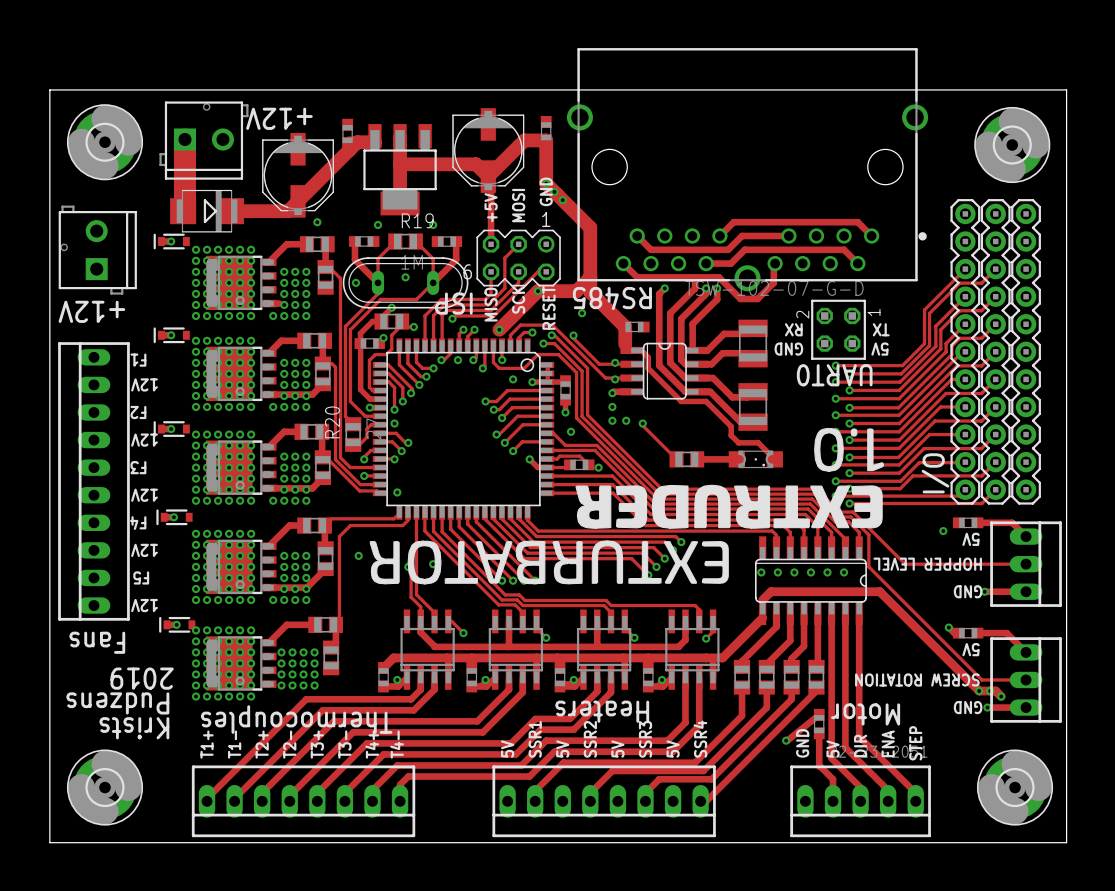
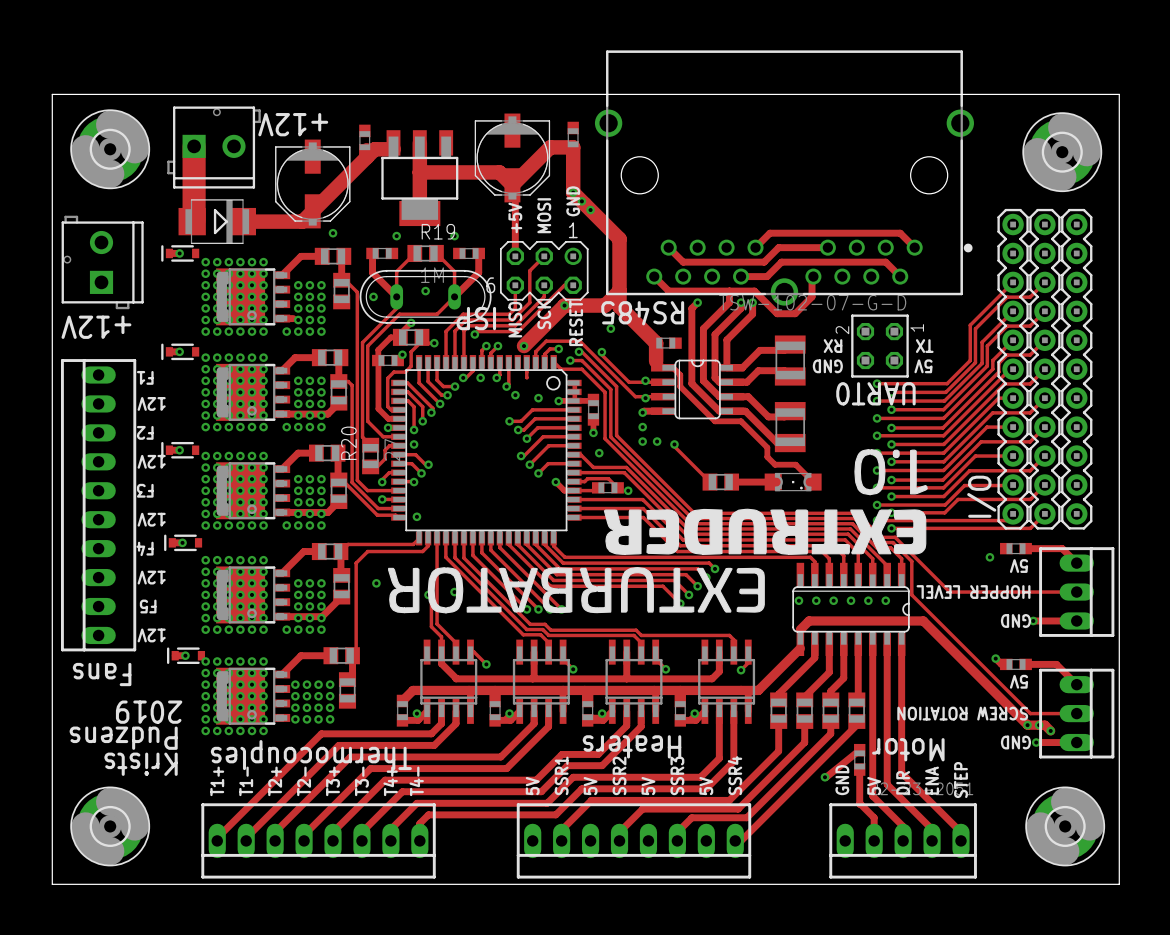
track: (493, 344) (493, 362) (499, 368) (524, 368) (537, 354) (558, 354) (576, 373) -> (553, 361) (561, 369) (581, 369) (605, 392)
via position: (502, 360) -> (515, 395)

